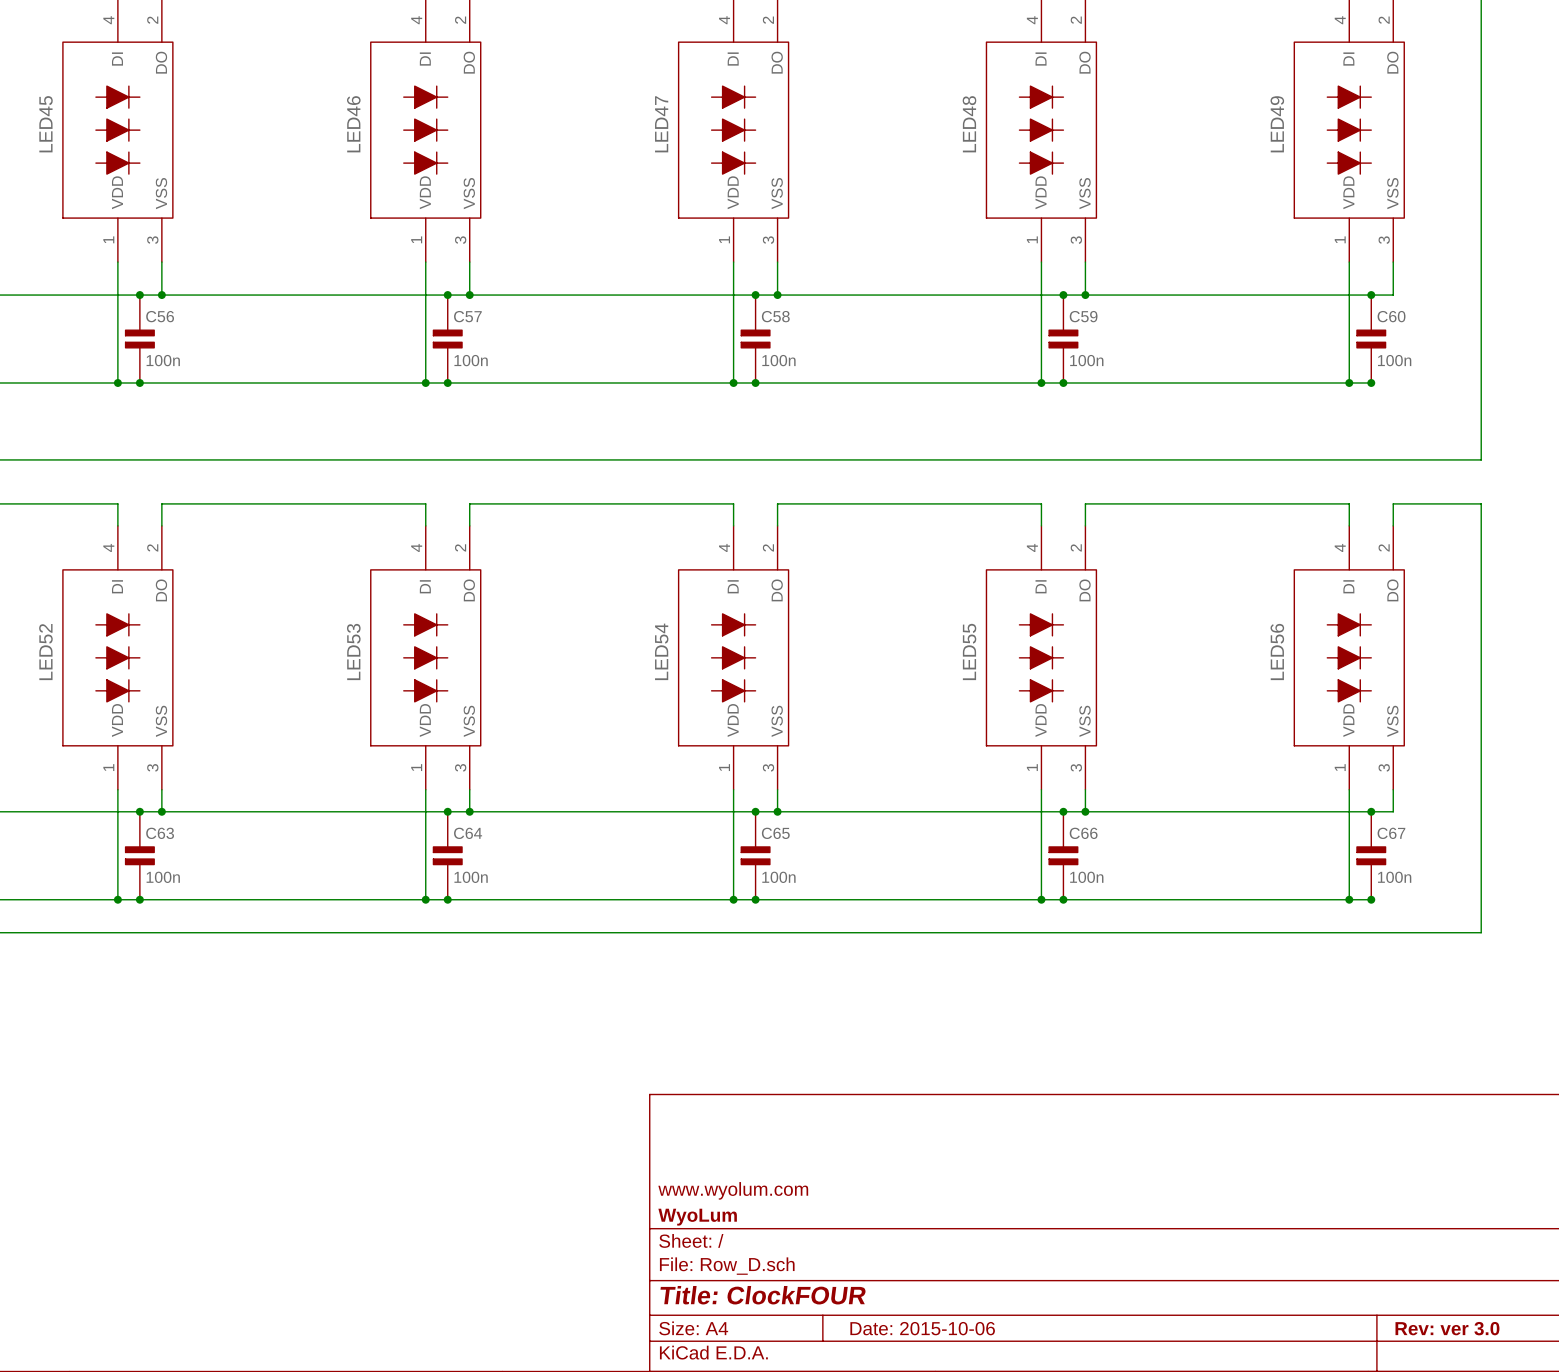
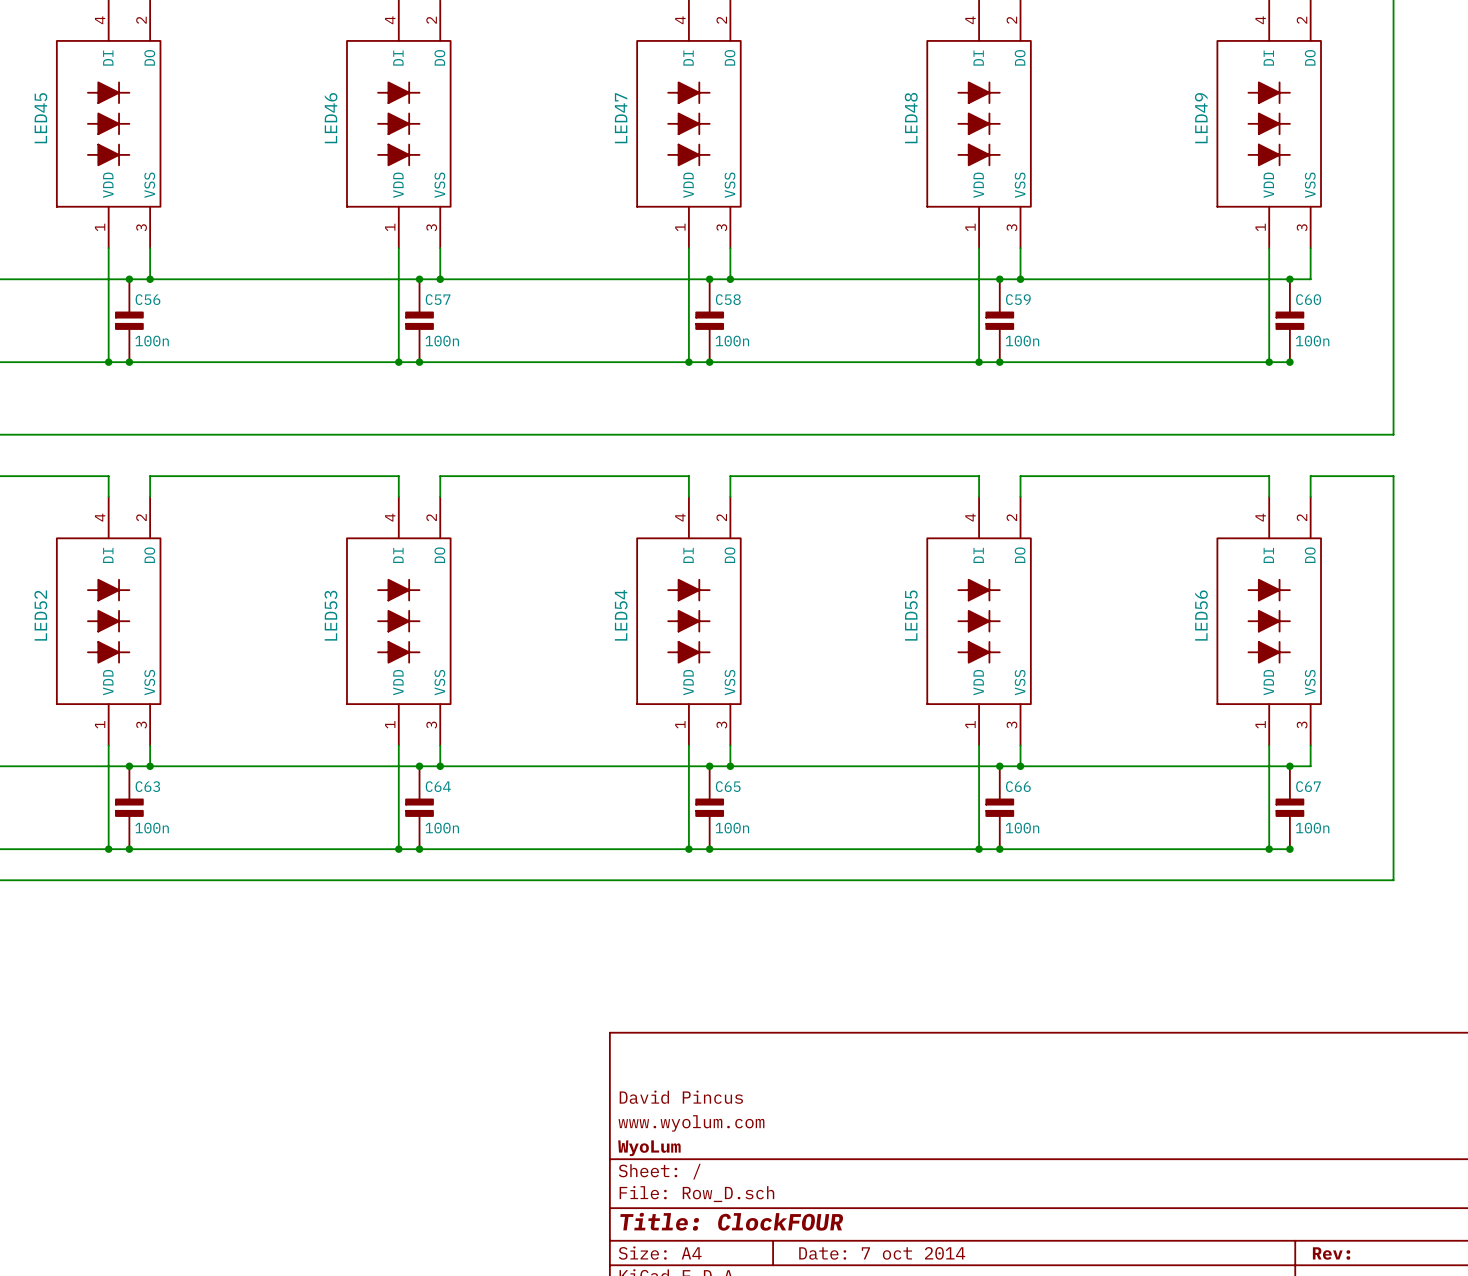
title block: none -> David Pincus (681, 1097)
title block: Date: 2015-10-06 (922, 1328) -> Date: 7 oct 2014 (882, 1253)
title block: Rev: ver 3.0 (1447, 1328) -> Rev: (1331, 1253)

